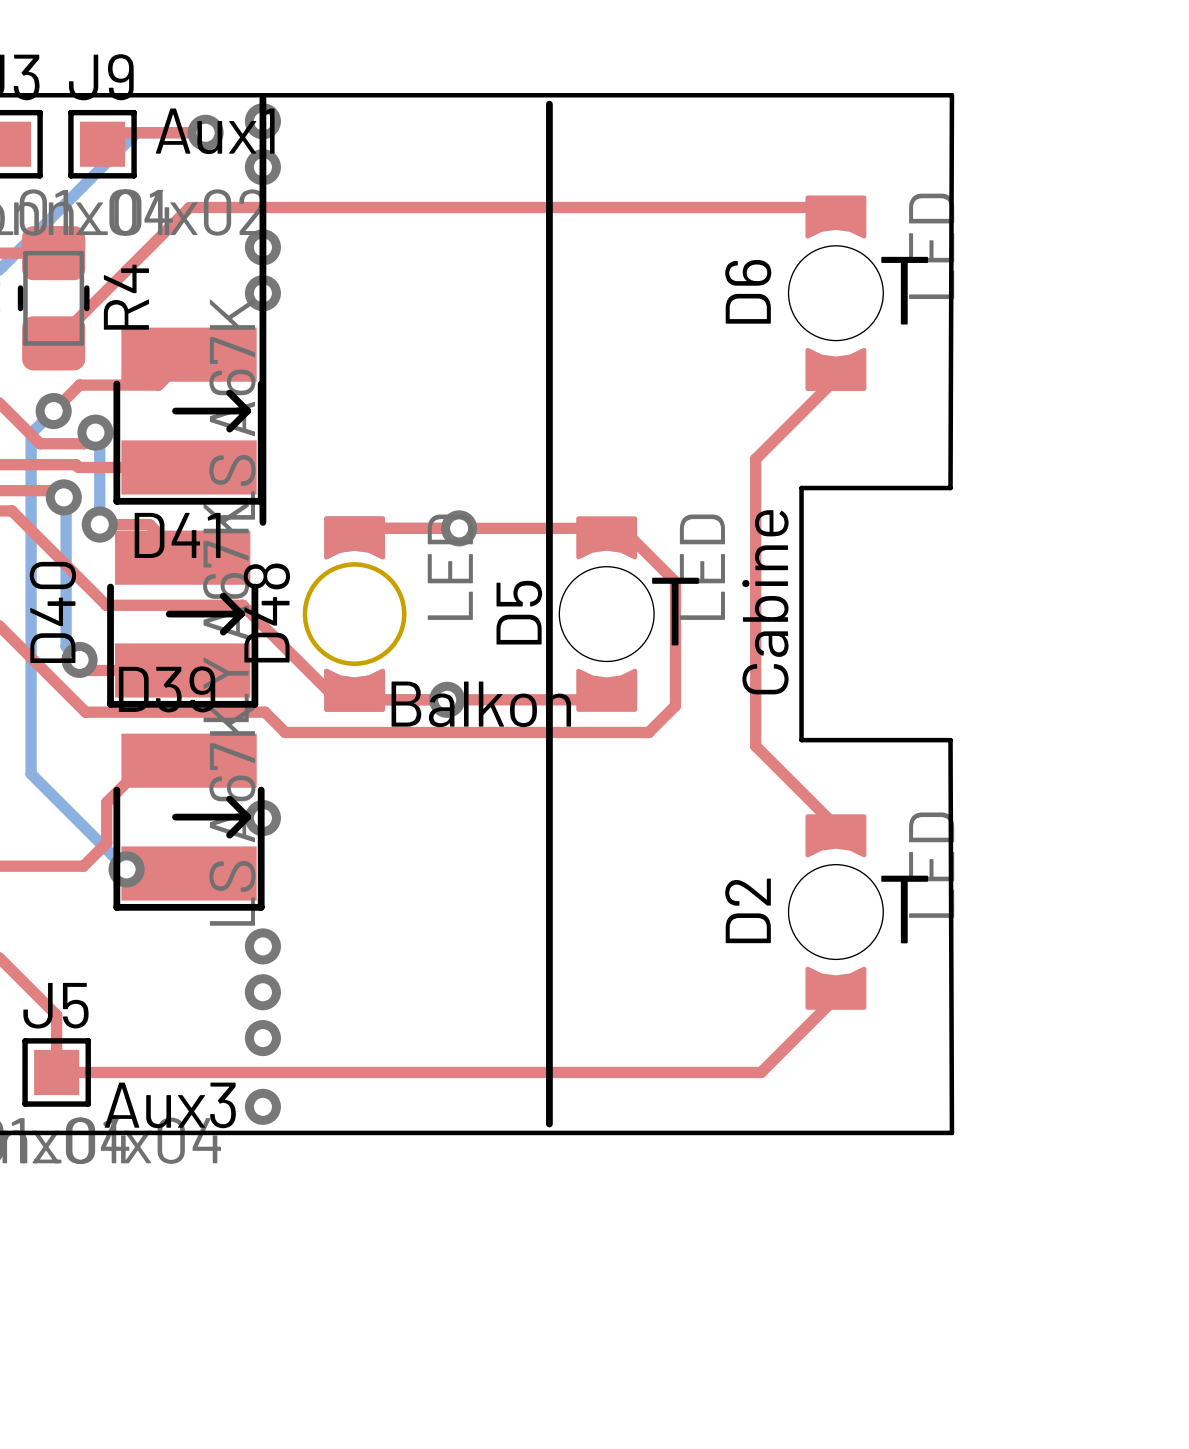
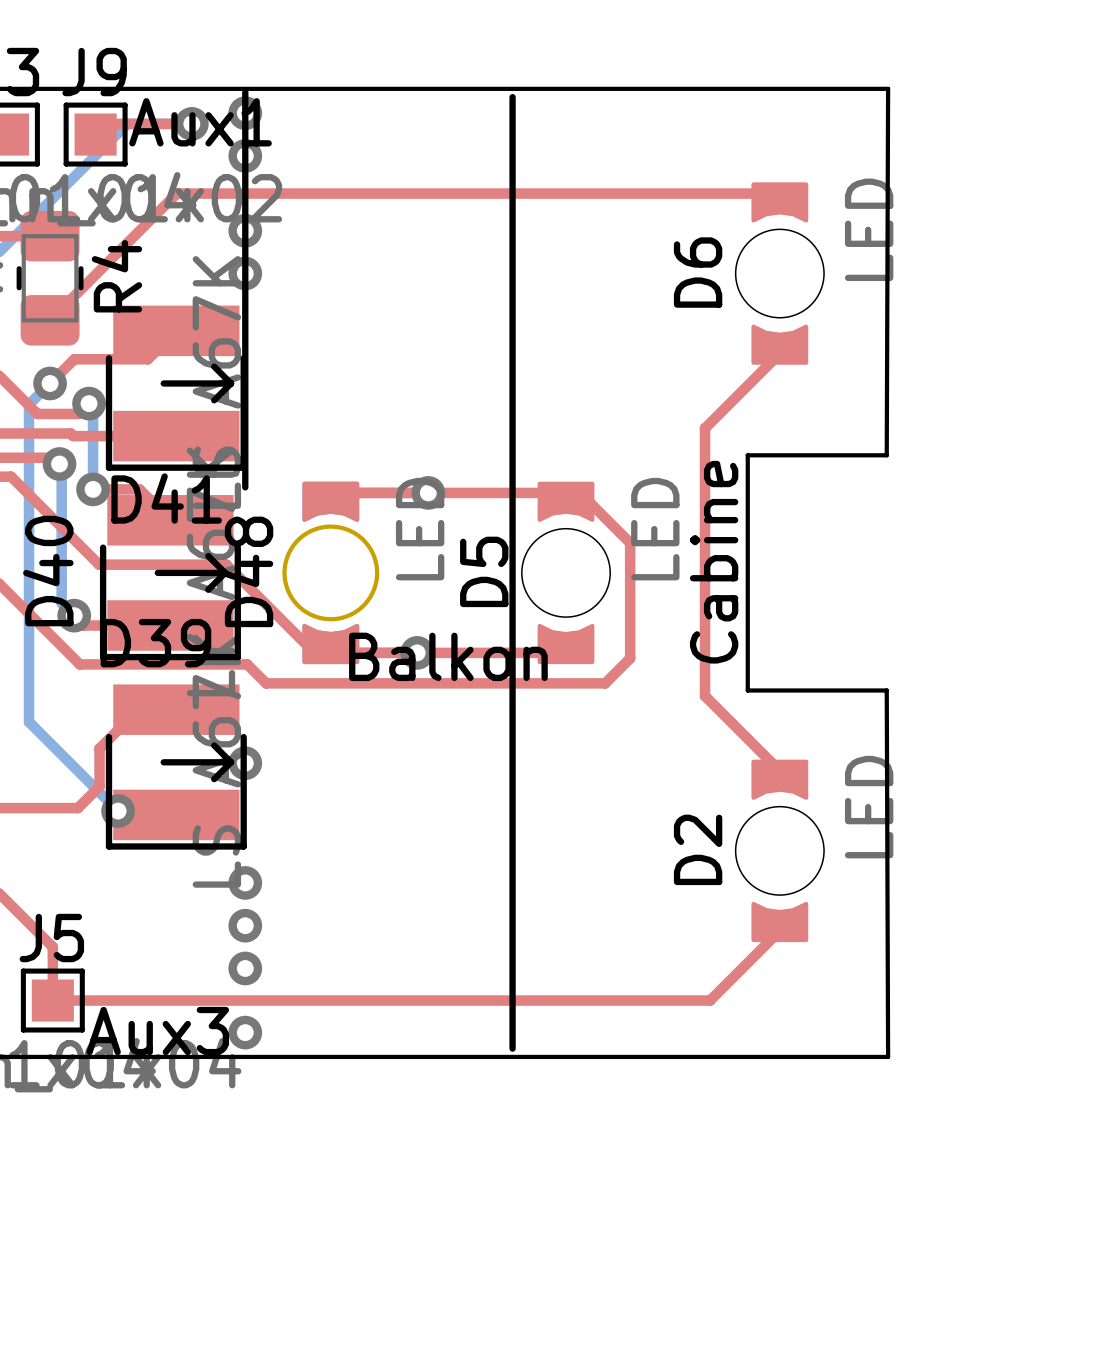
D6 text: T (904, 290) -> none
D5 text: T (675, 611) -> none
D2 text: T (904, 909) -> none

